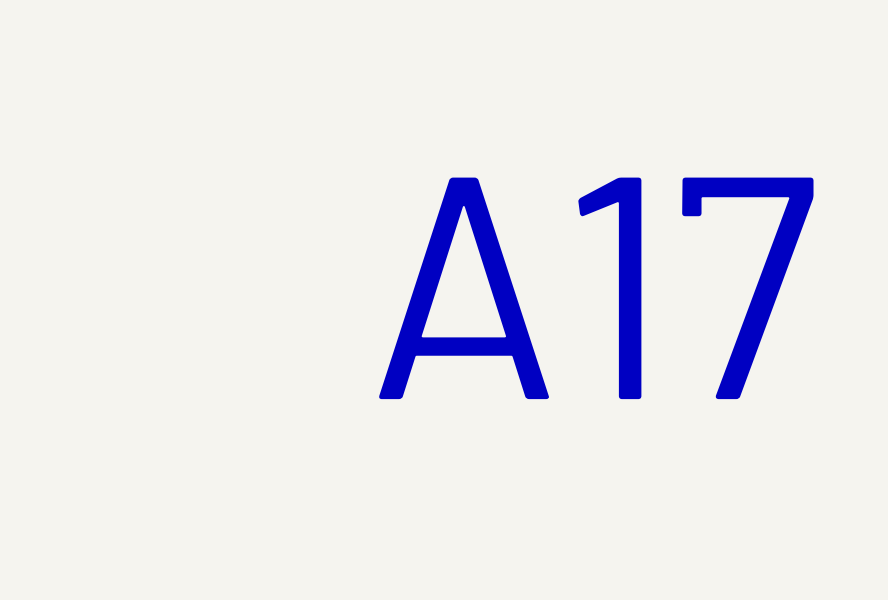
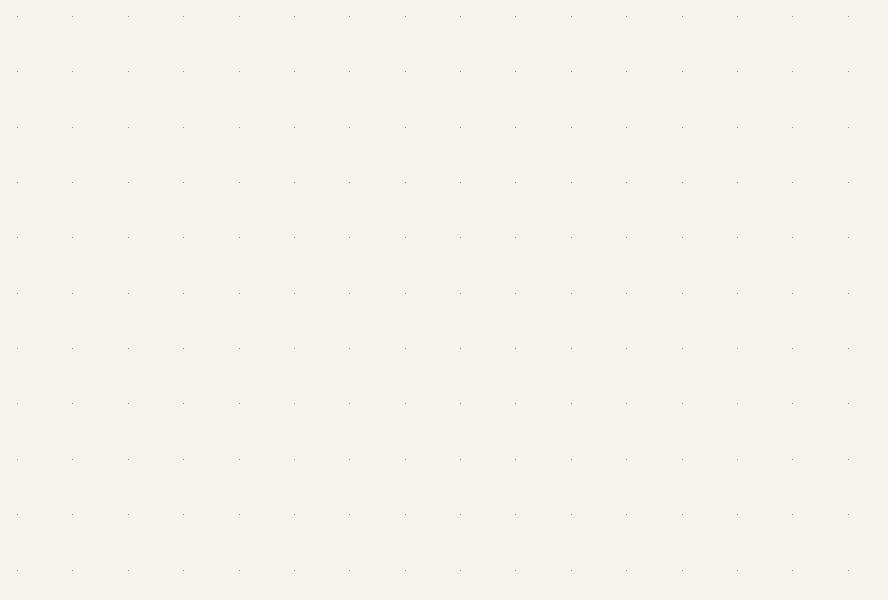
text: A17 (595, 288) -> none

